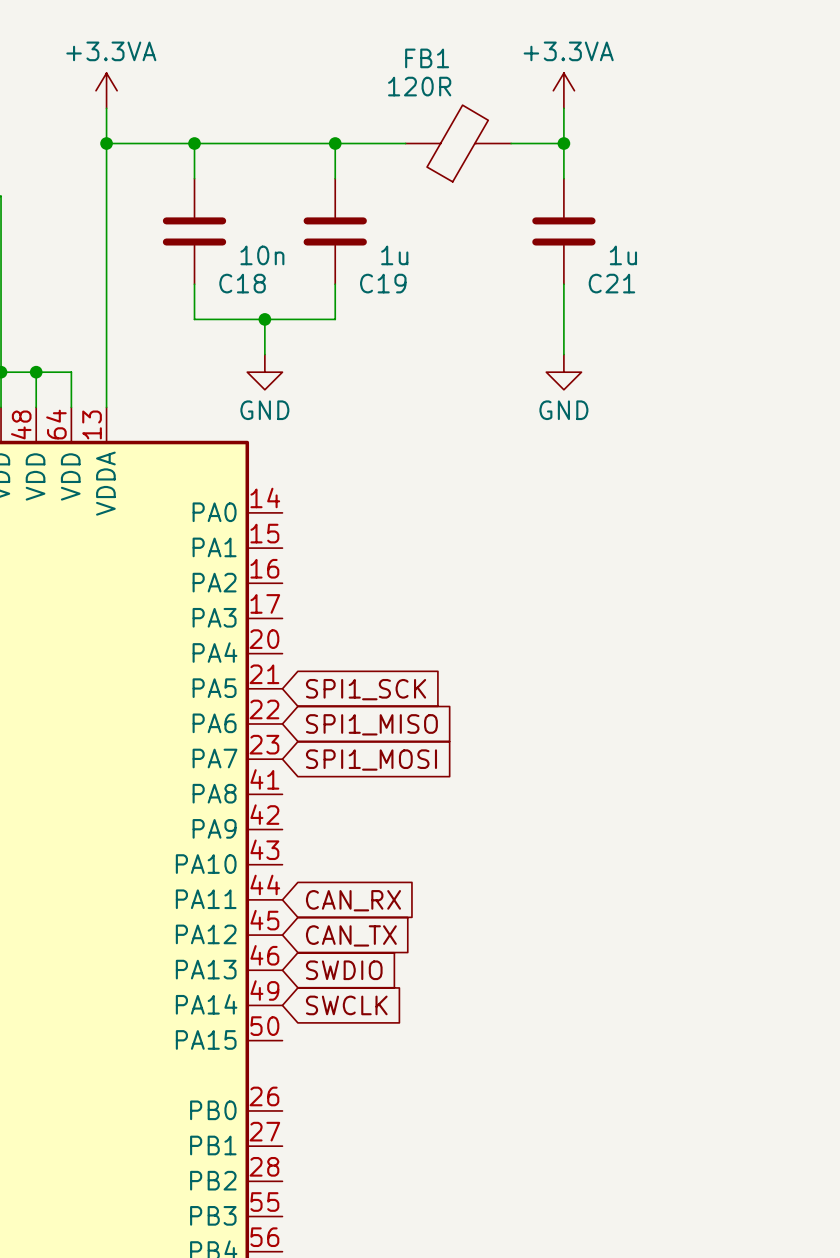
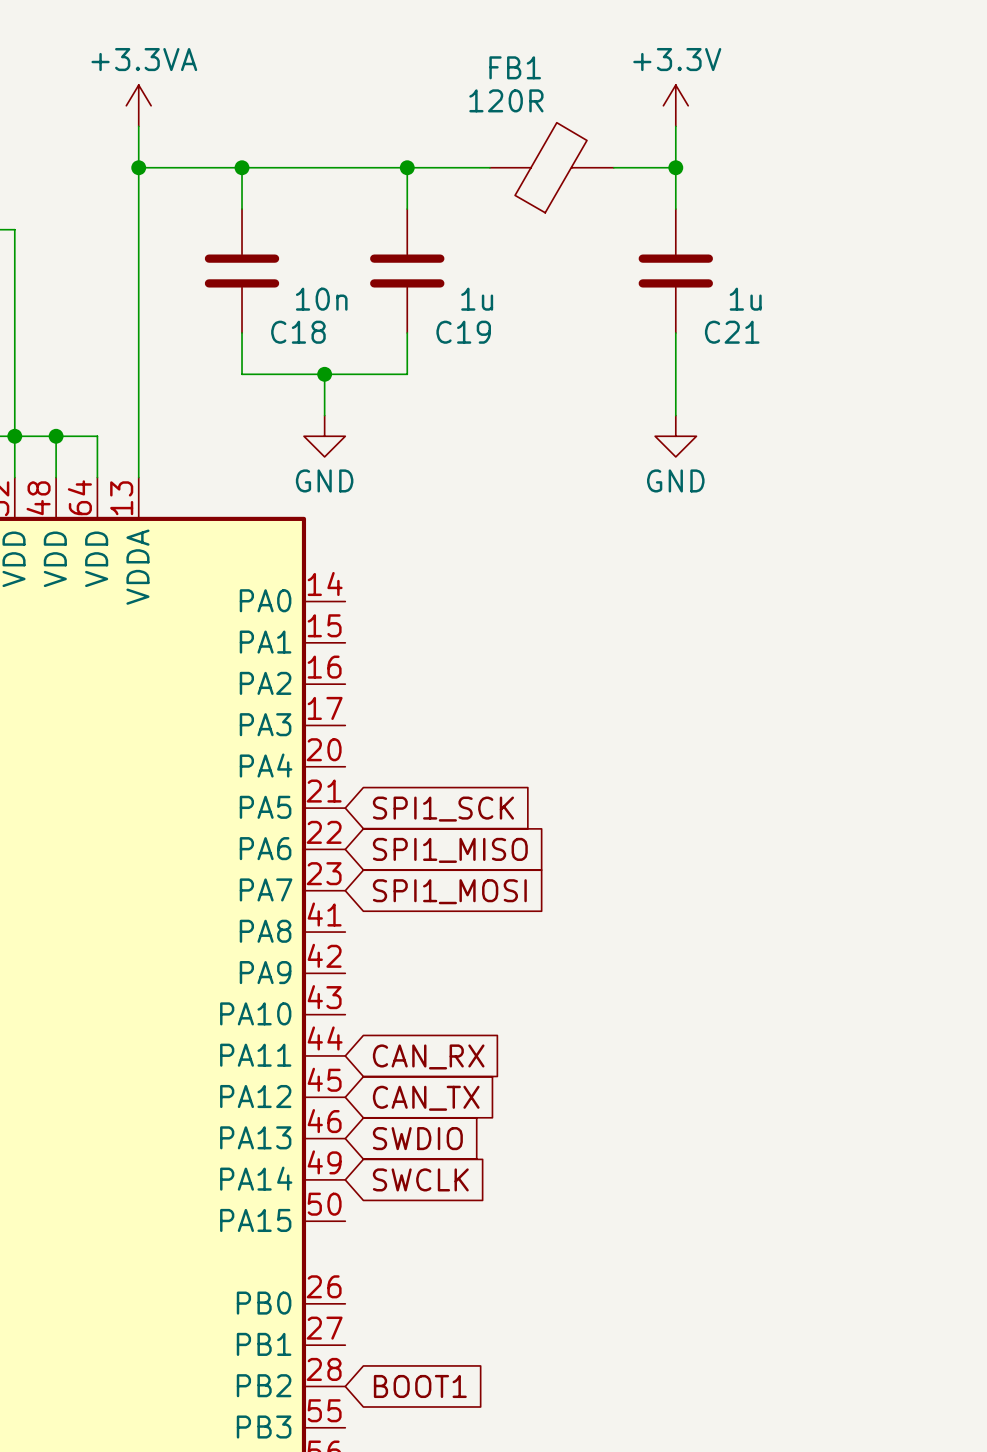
power symbol: +3.3VA (563, 90) -> +3.3V (675, 105)
global label: none -> BOOT1 (420, 1386)

